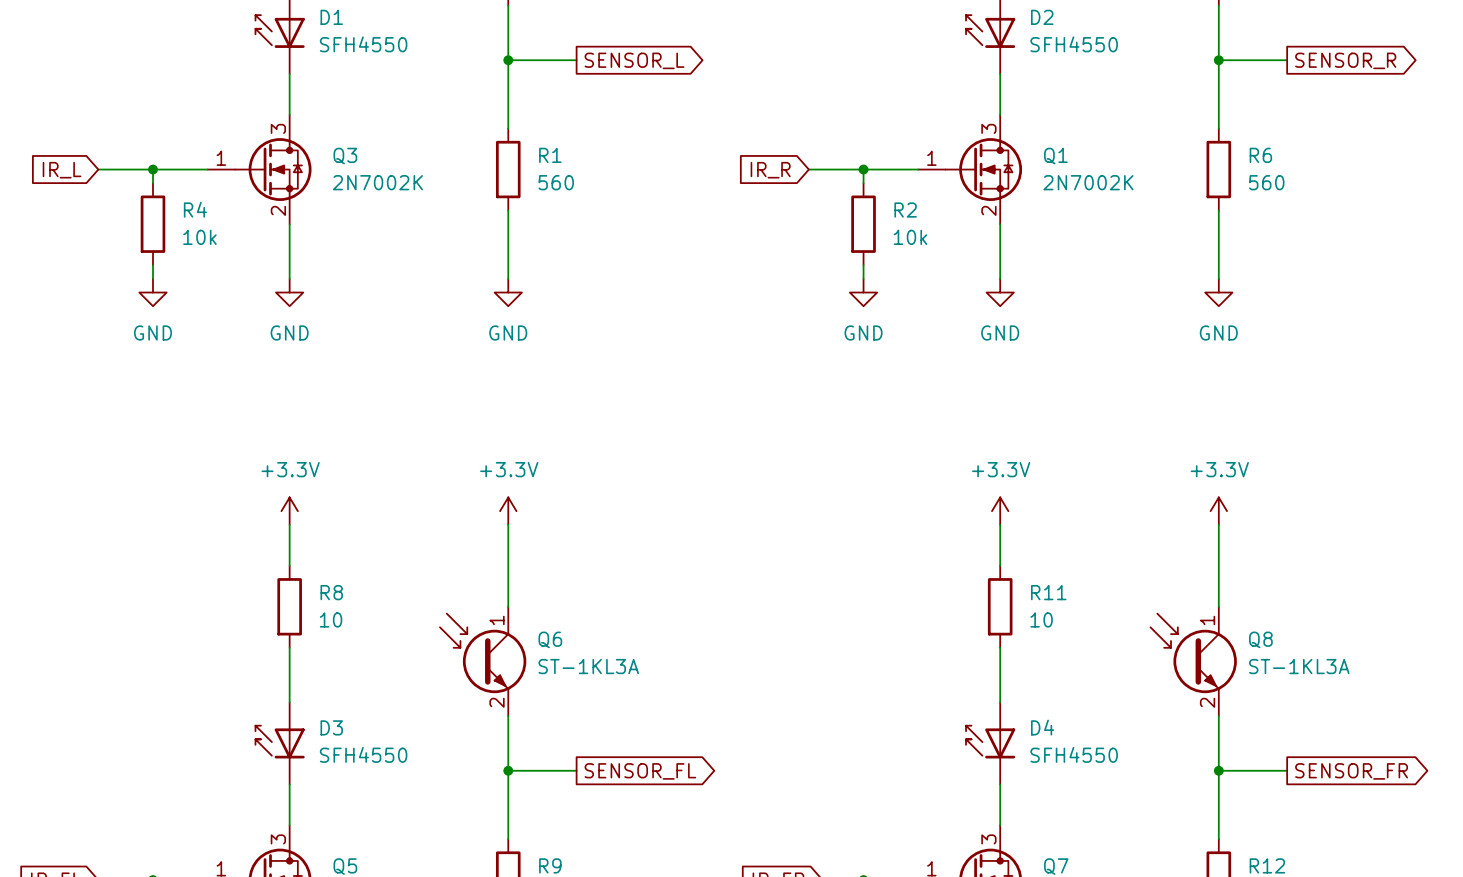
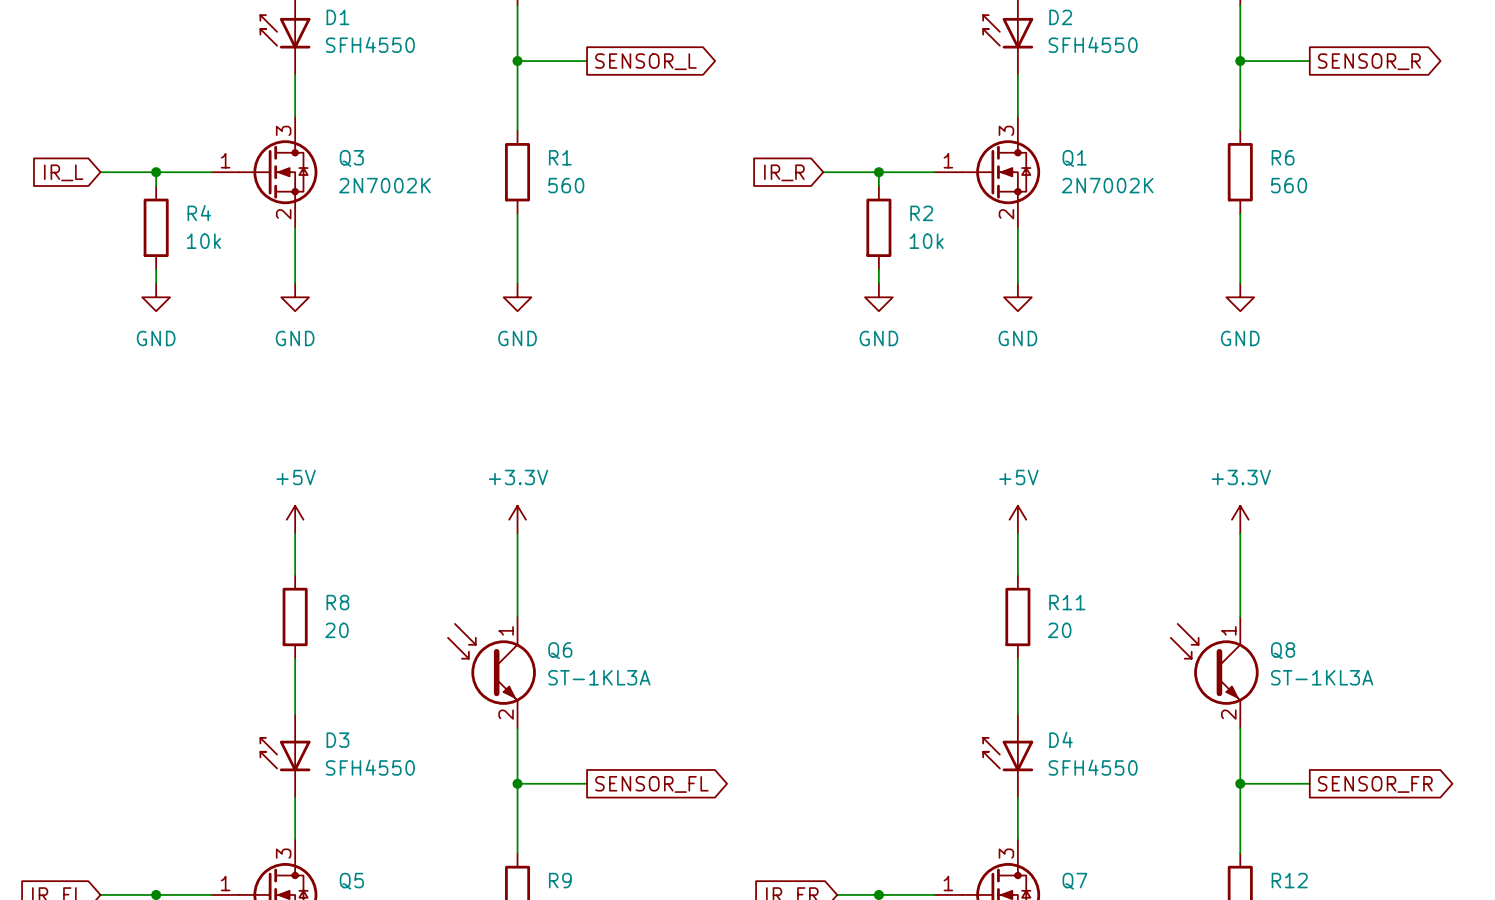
power symbol: +3.3V (289, 511) -> +5V (295, 519)
power symbol: +3.3V (1000, 511) -> +5V (1017, 519)
R8 value: 10 (331, 619) -> 20 (336, 630)
R11 value: 10 (1041, 619) -> 20 (1059, 630)

